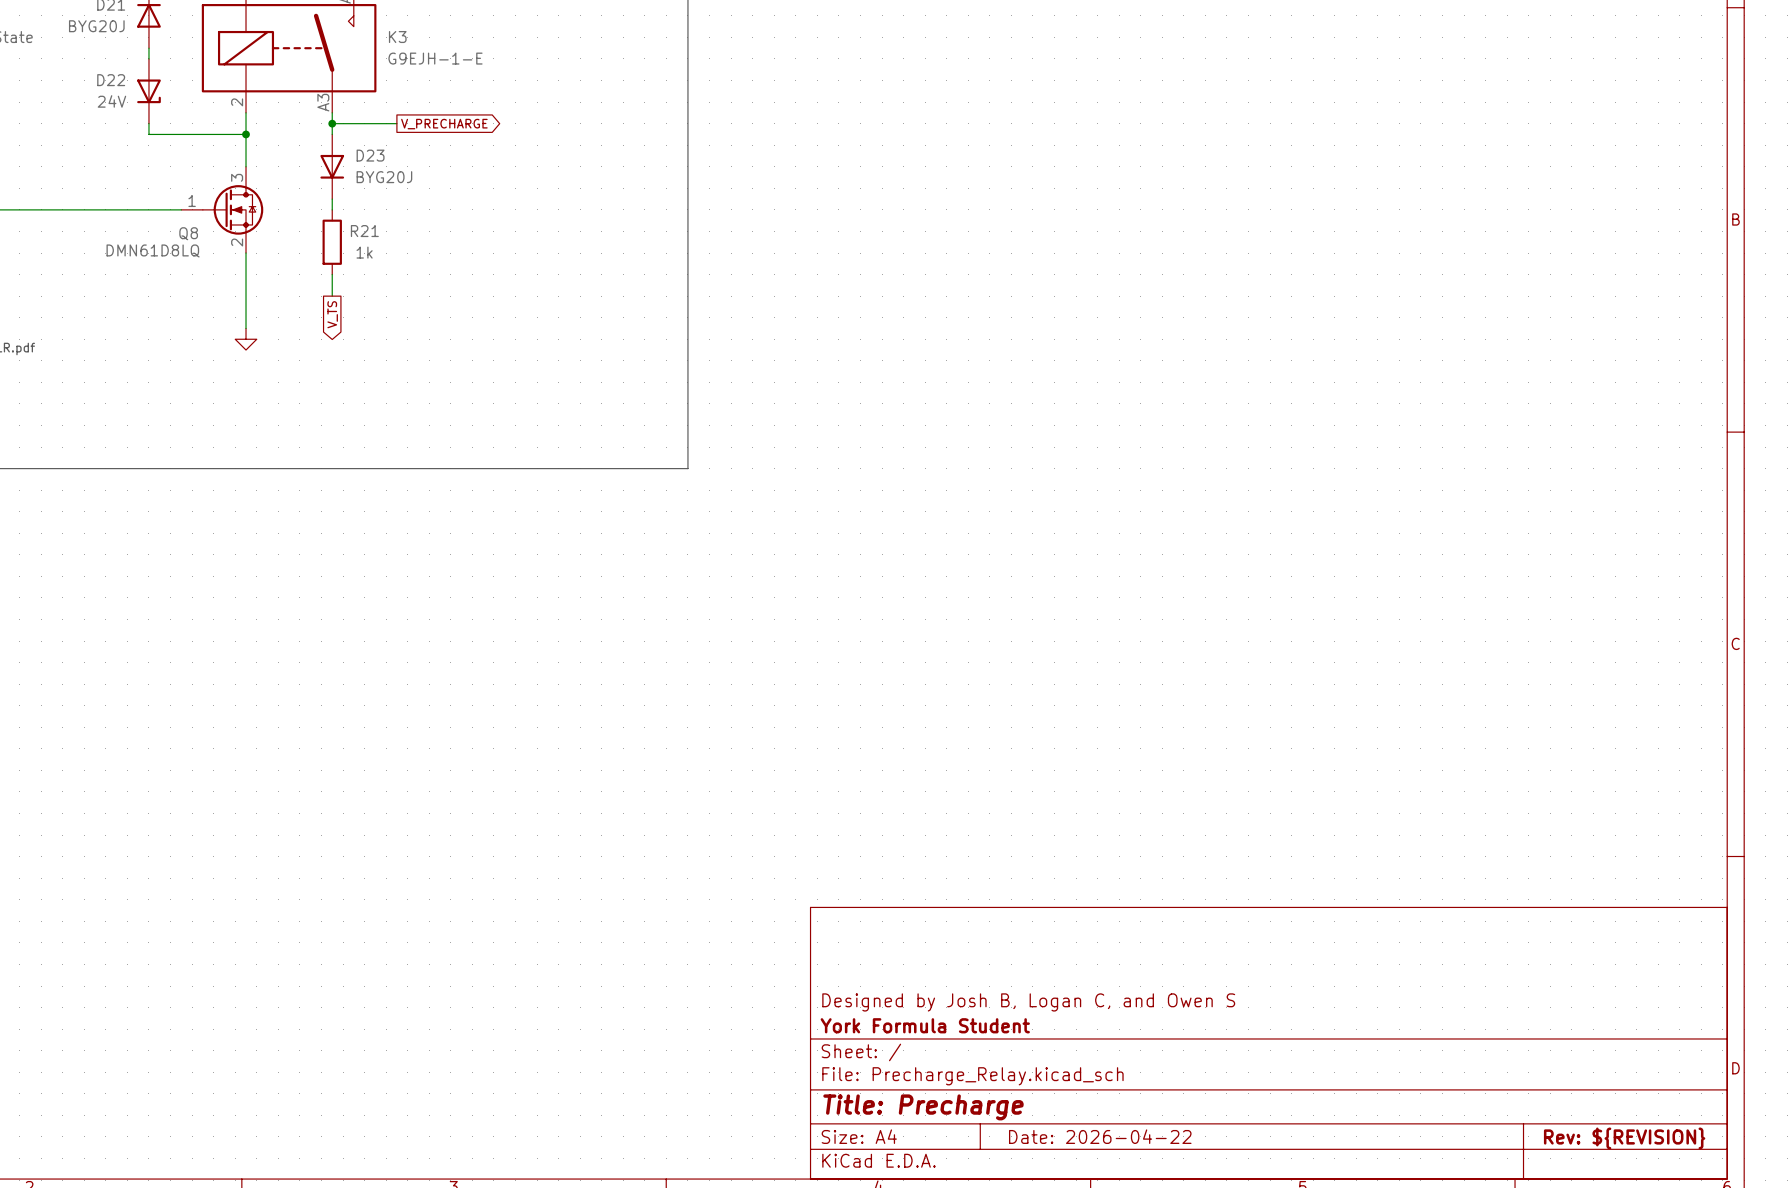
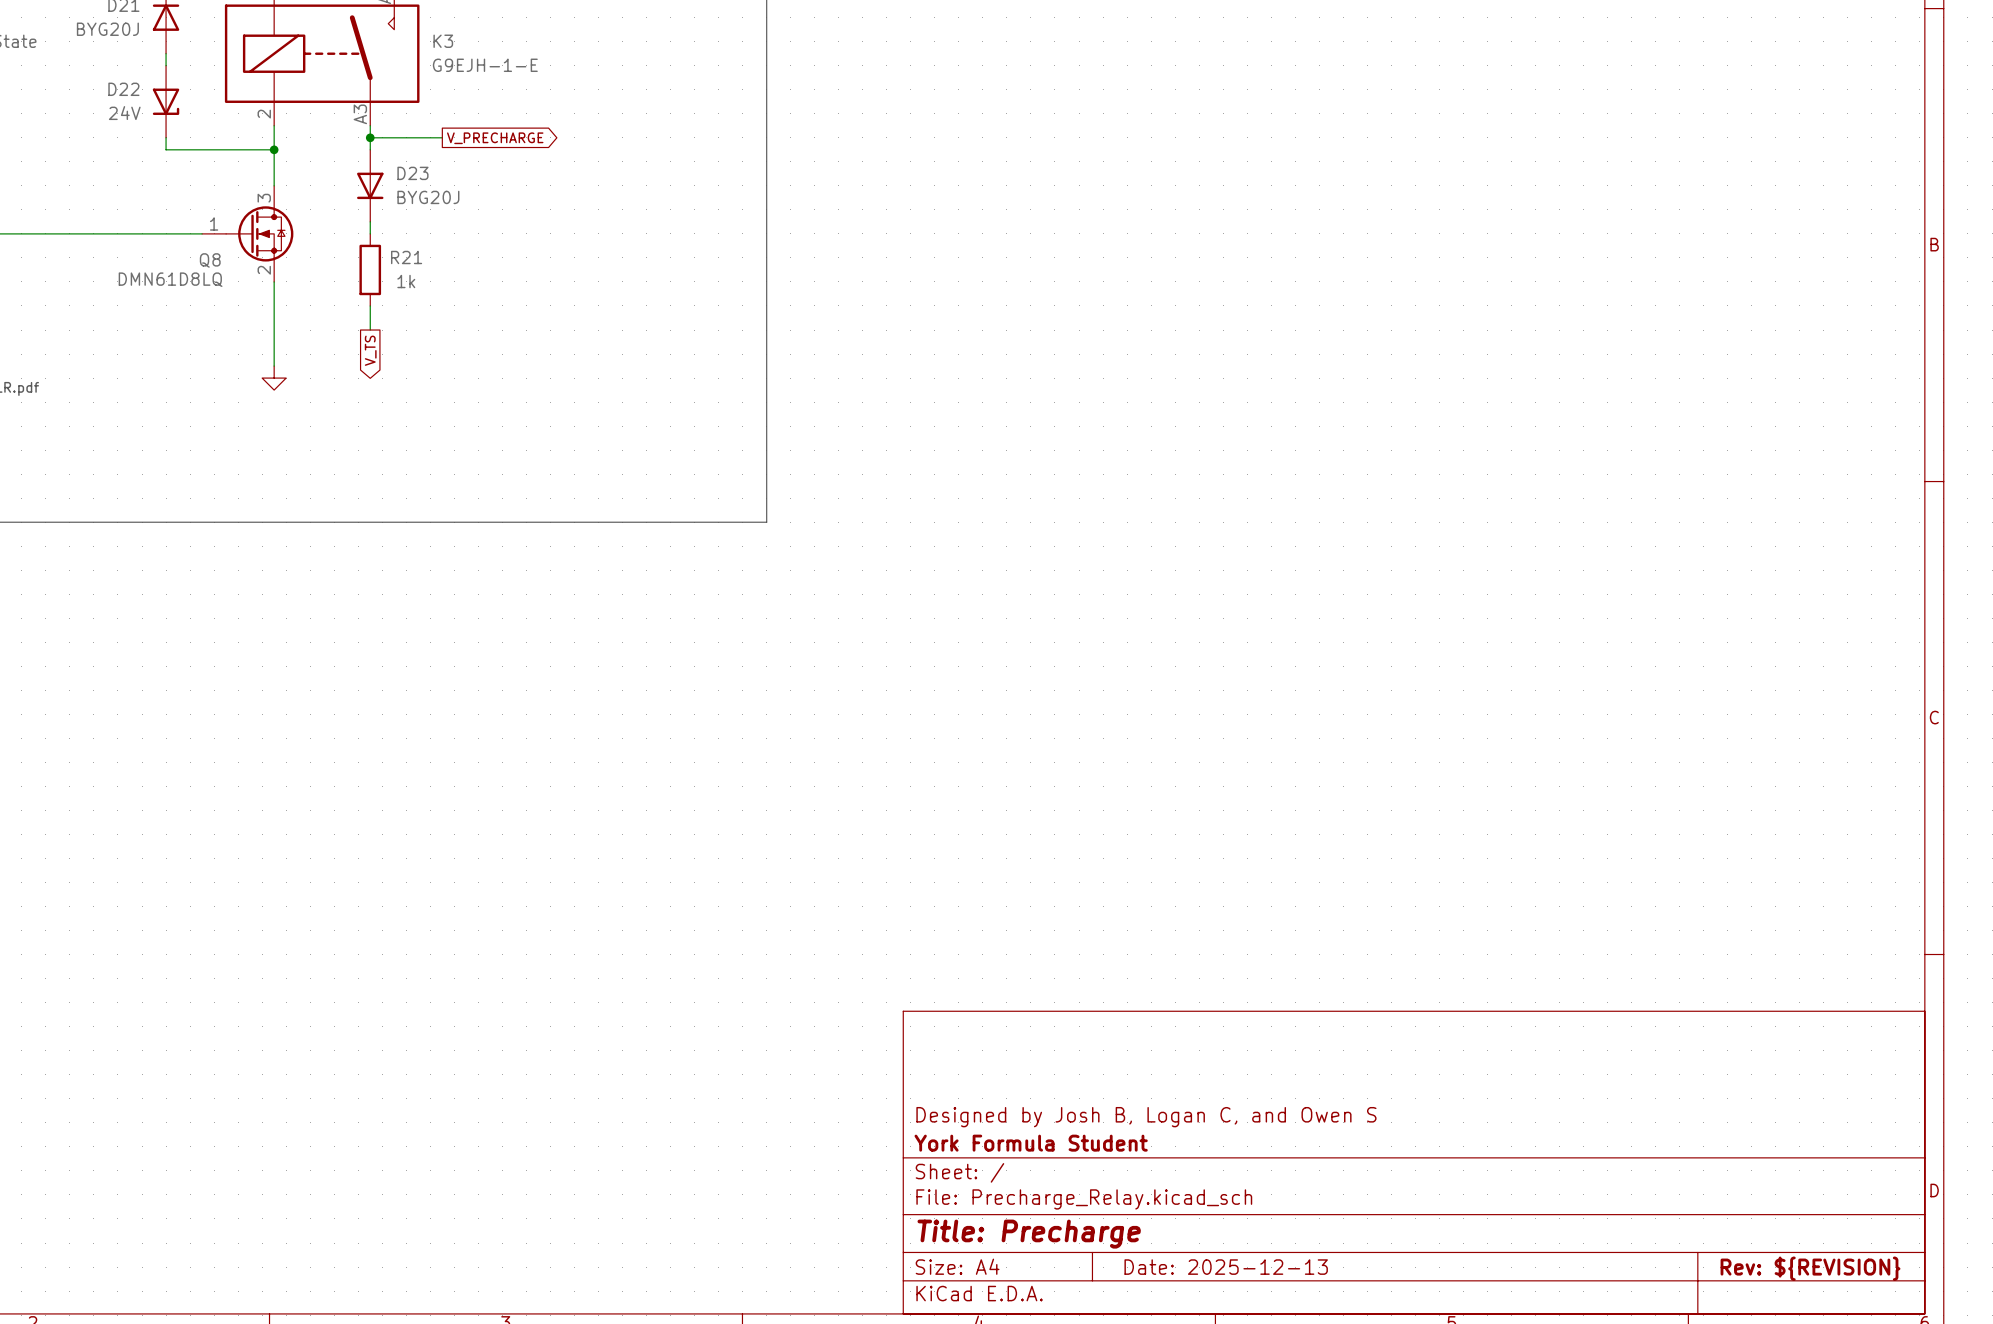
title block: Date: 2026-04-22 (1100, 1136) -> Date: 2025-12-13 (1226, 1267)

